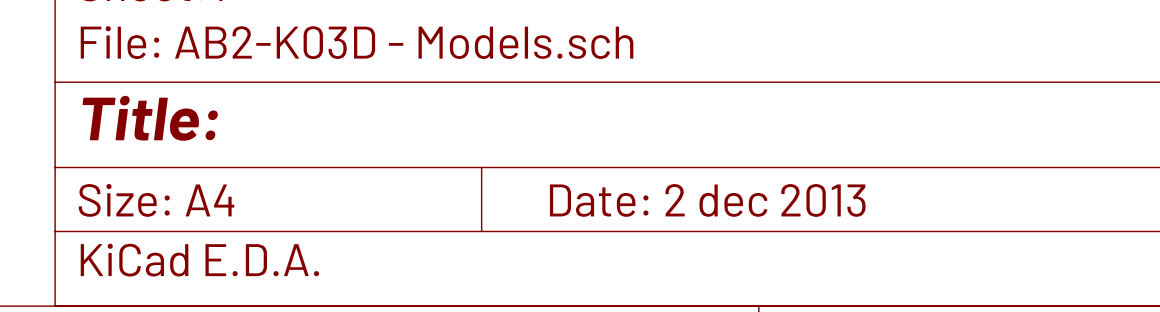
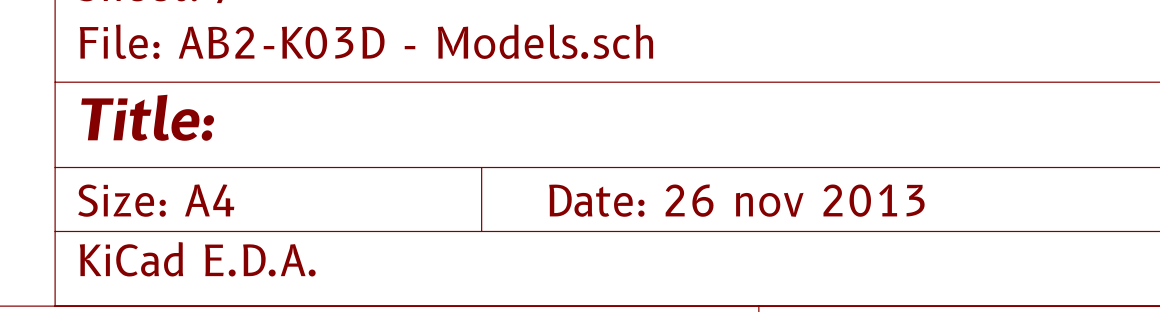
title block: Date: 2 dec 2013 (707, 200) -> Date: 26 nov 2013 (736, 200)

